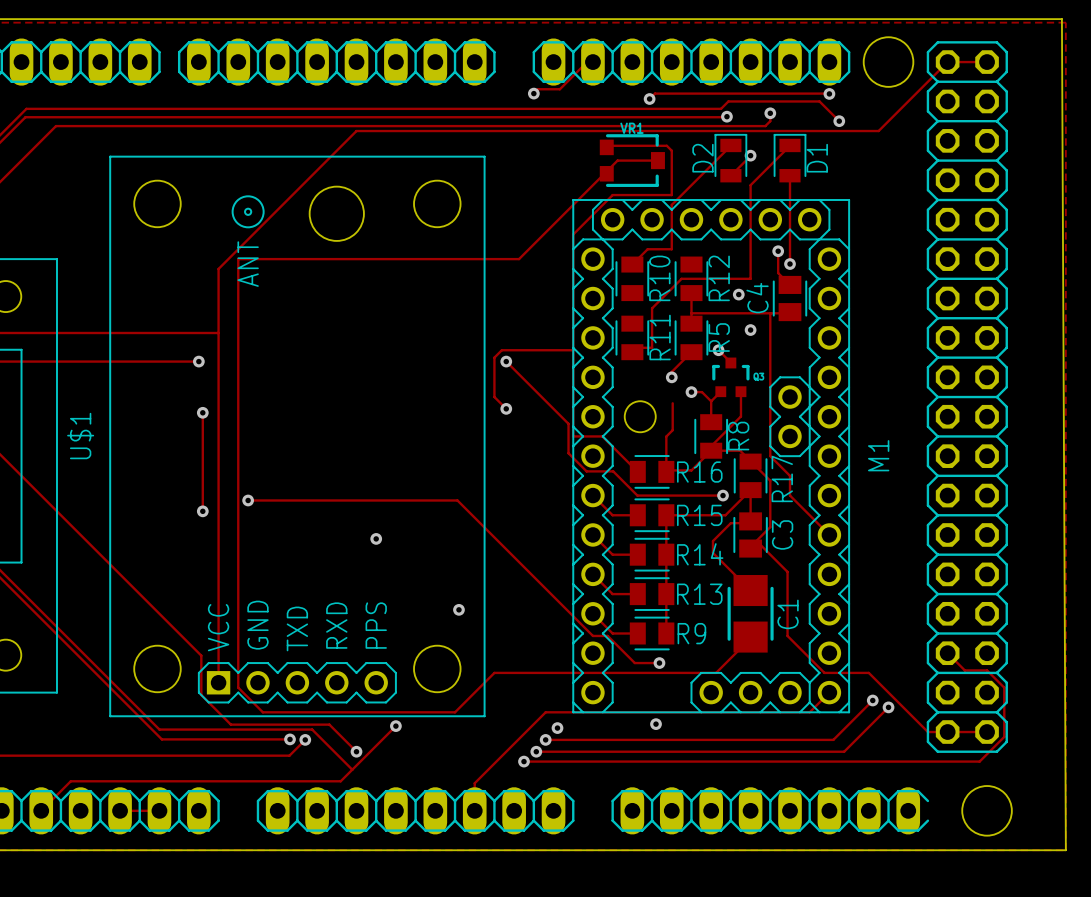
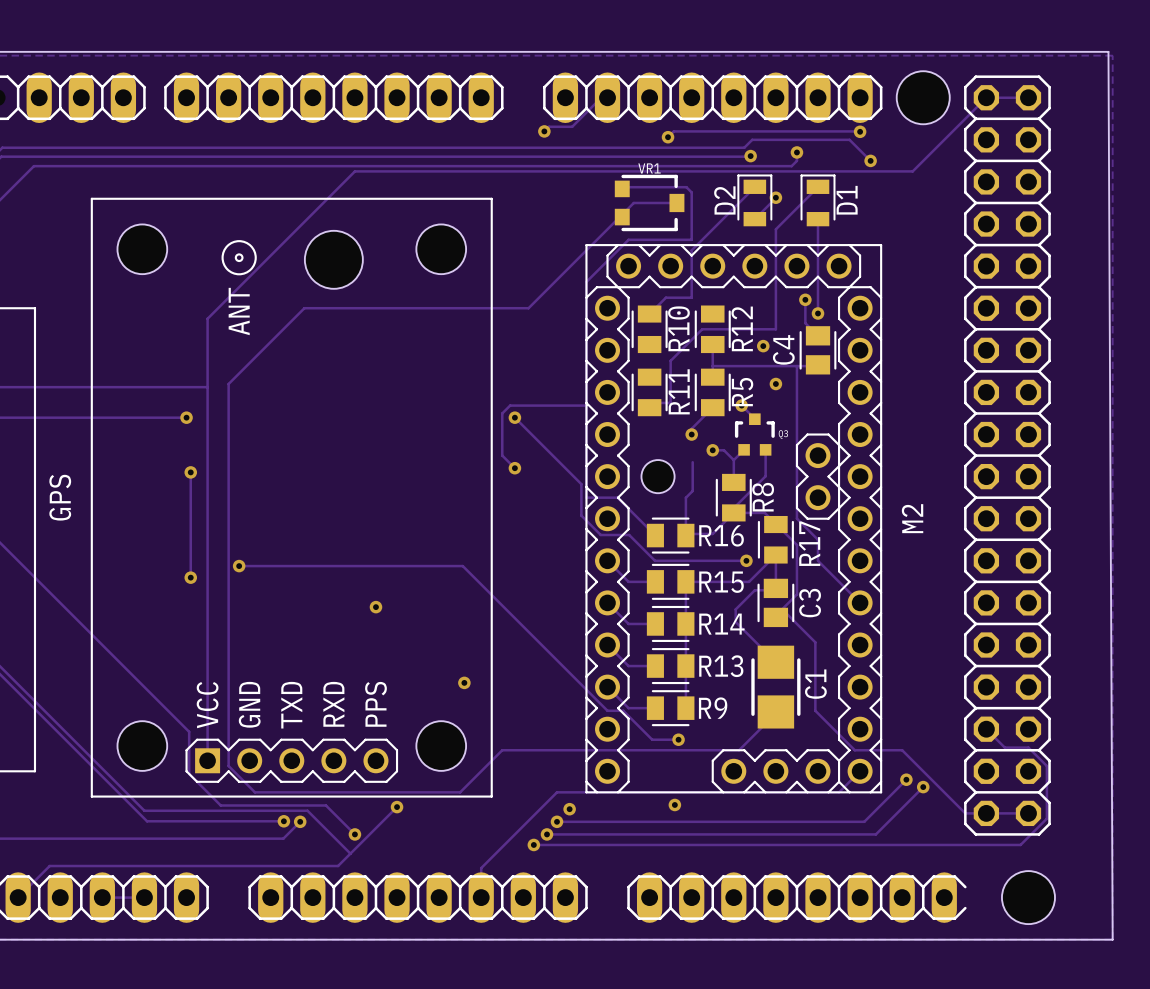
track: (309, 259) (238, 259) (238, 330) -> (304, 308) (228, 384)
U$1 name: U$1 (80, 436) -> GPS (60, 497)
M1 name: M1 (878, 455) -> M2 (912, 518)

